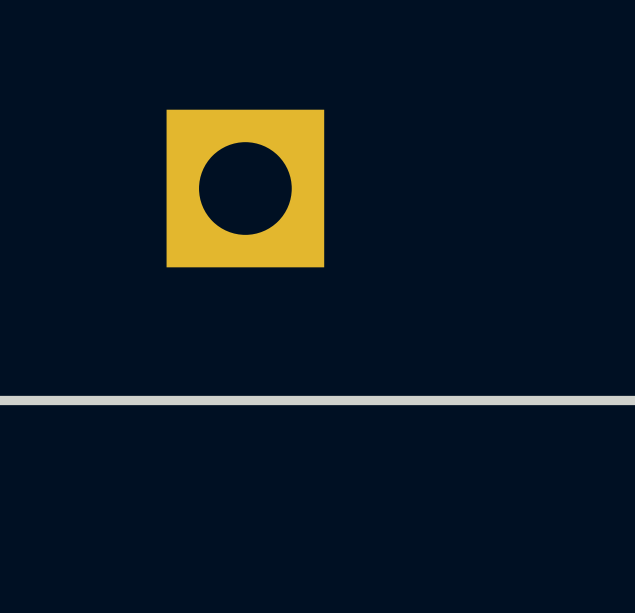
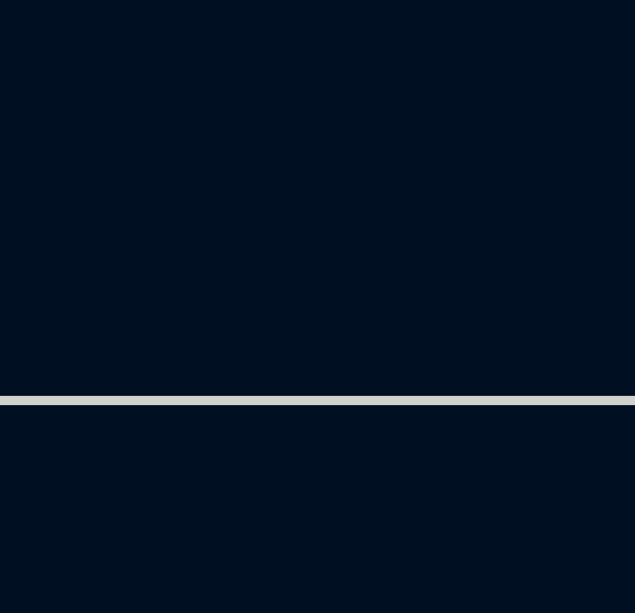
part: (245, 188) -> none

